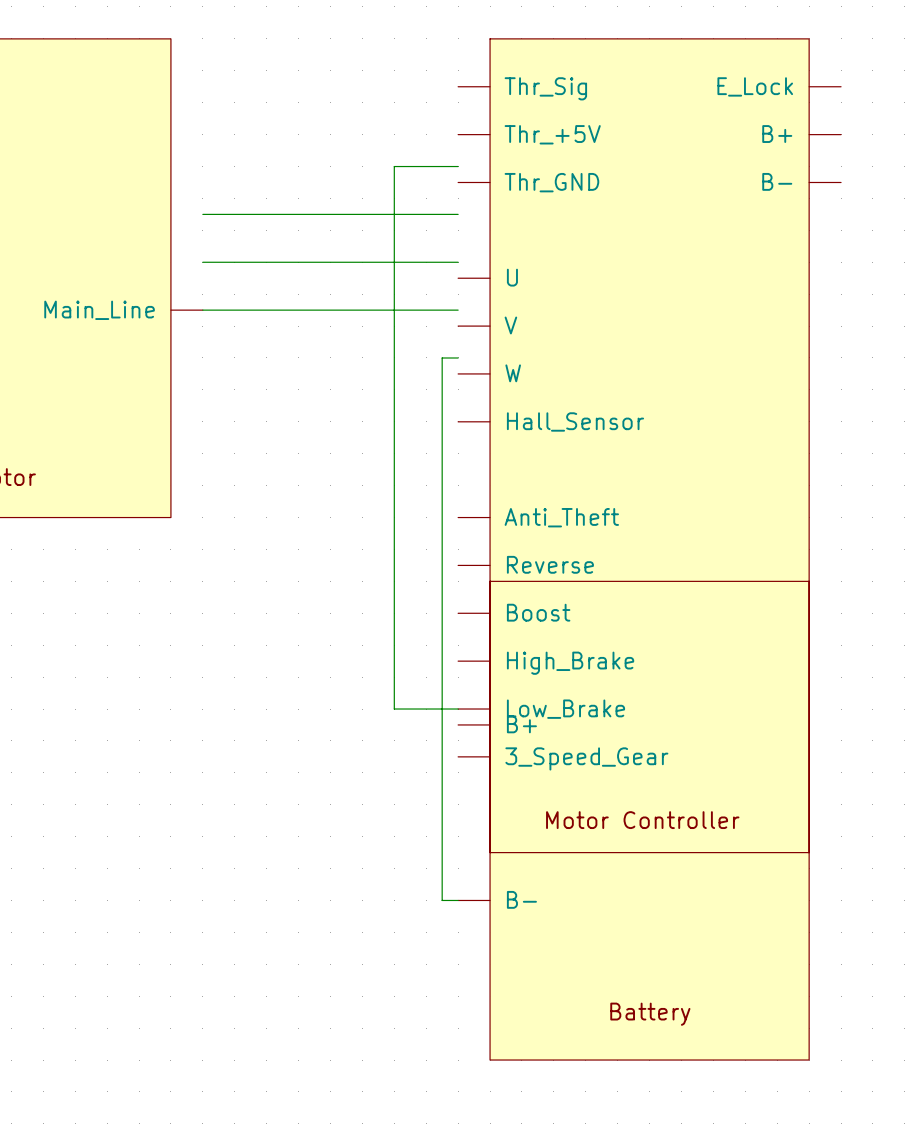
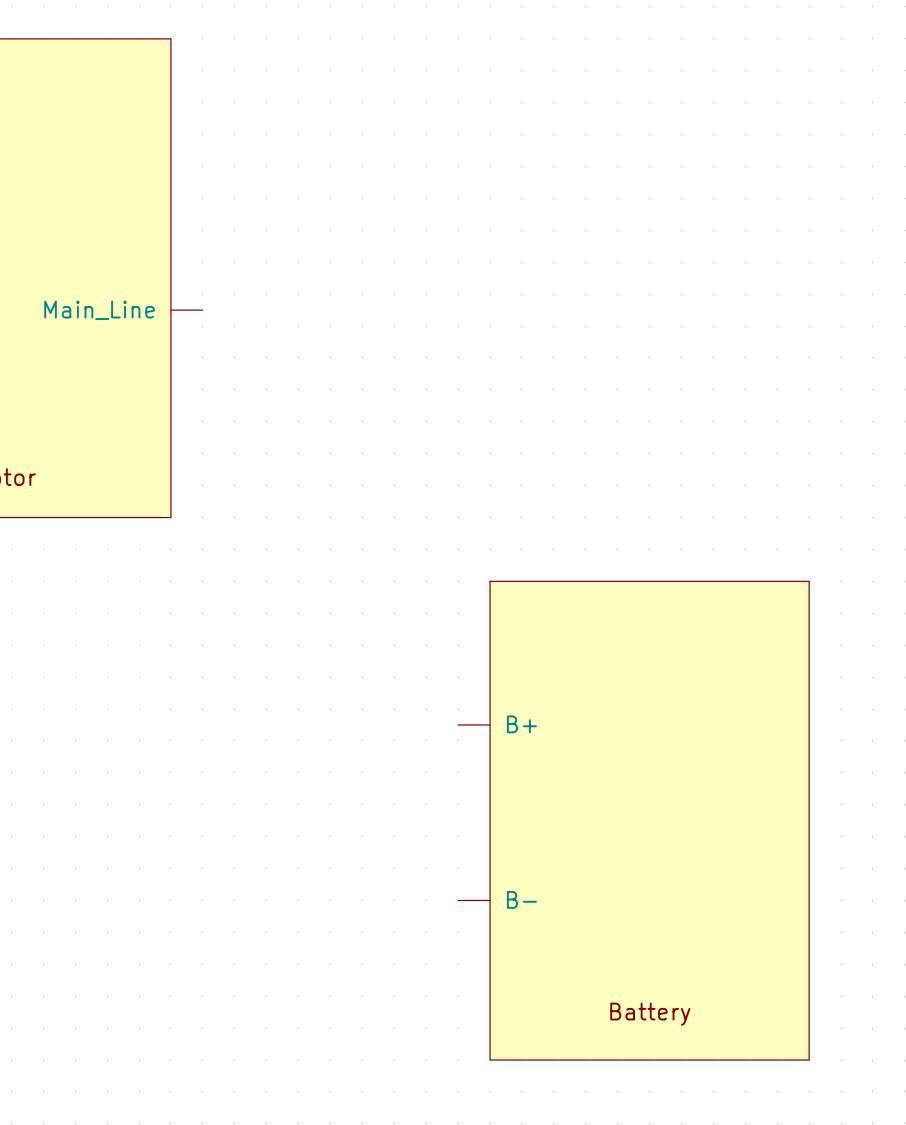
wire: (458, 166) (394, 166) (394, 709) (458, 709) -> none
wire: (202, 214) (458, 214) -> none
wire: (202, 262) (458, 262) -> none
wire: (202, 310) (458, 310) -> none
wire: (458, 357) (442, 357) (442, 900) (458, 900) -> none
part: (649, 445) -> none

